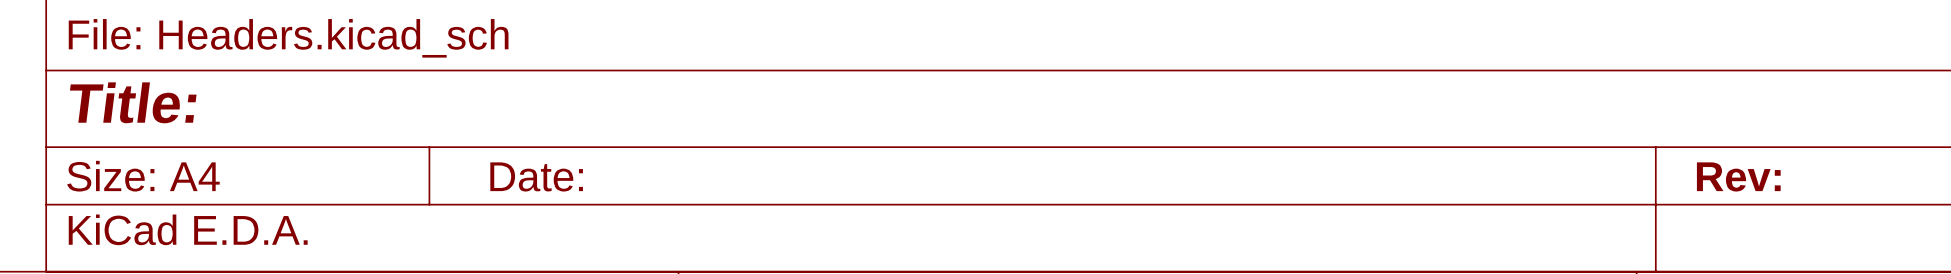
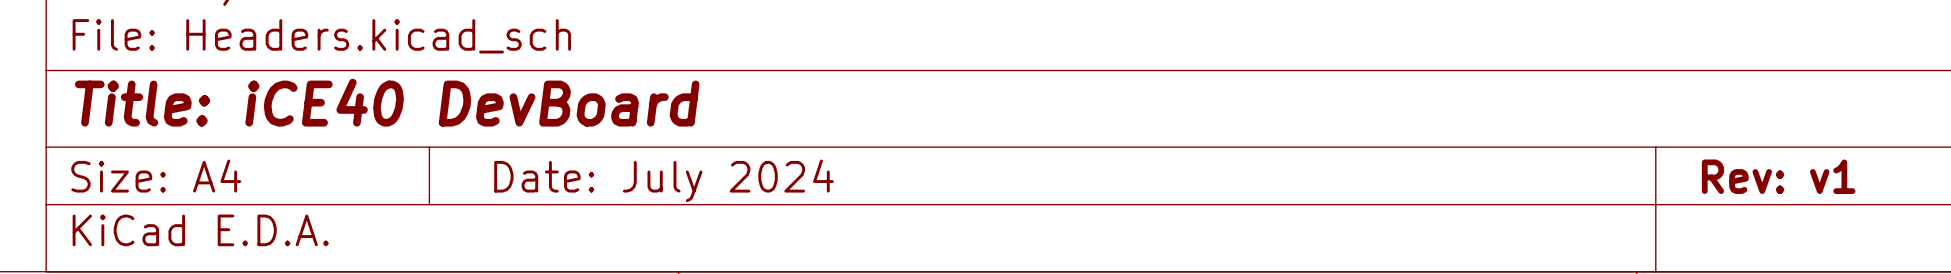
title block: Title: (133, 102) -> Title: iCE40 DevBoard (387, 102)
title block: Date: (536, 176) -> Date: July 2024 (664, 180)
title block: Rev: (1738, 176) -> Rev: v1 (1778, 176)

